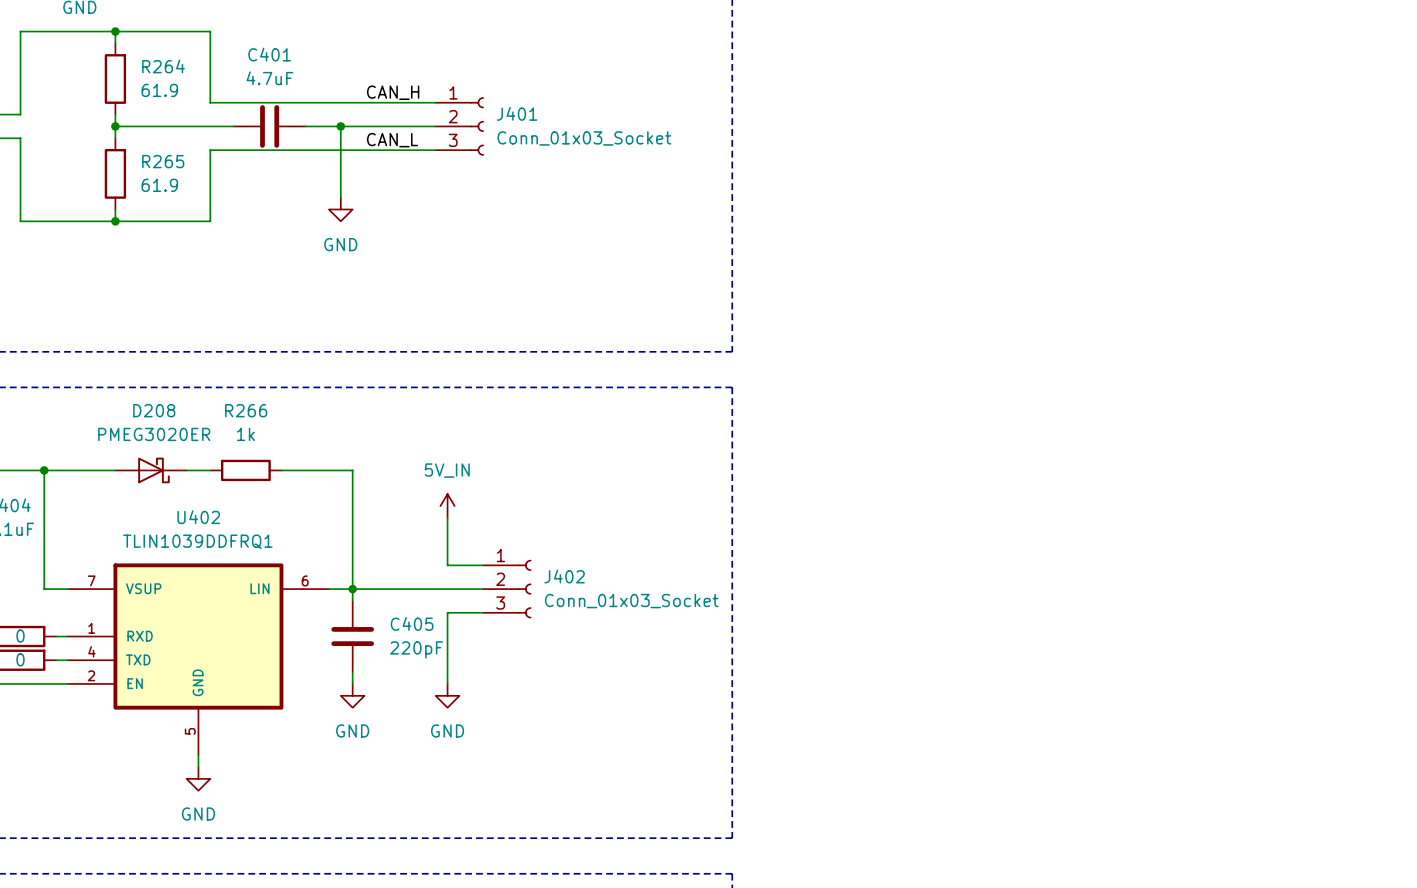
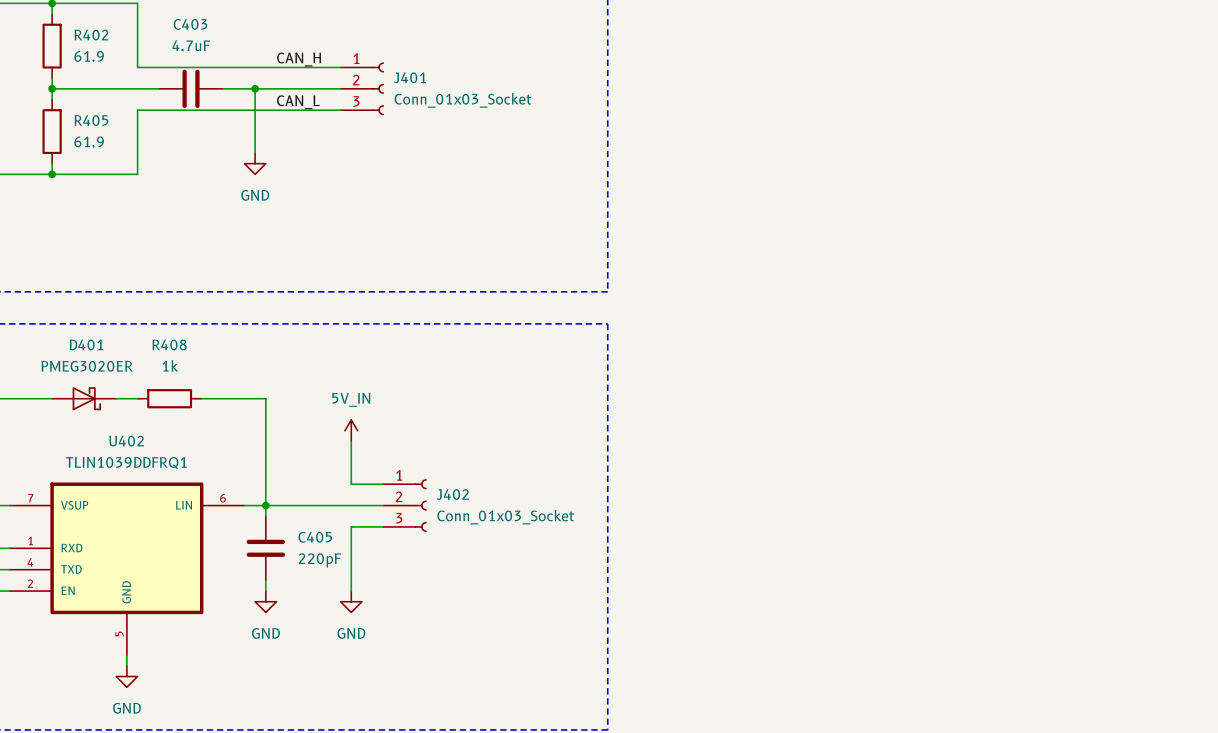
C401 name: C401 (269, 54) -> C403 (190, 24)
R264 name: R264 (163, 66) -> R402 (91, 35)
R265 name: R265 (163, 161) -> R405 (91, 120)
D208 name: D208 (154, 410) -> D401 (86, 344)
R266 name: R266 (246, 410) -> R408 (169, 344)

